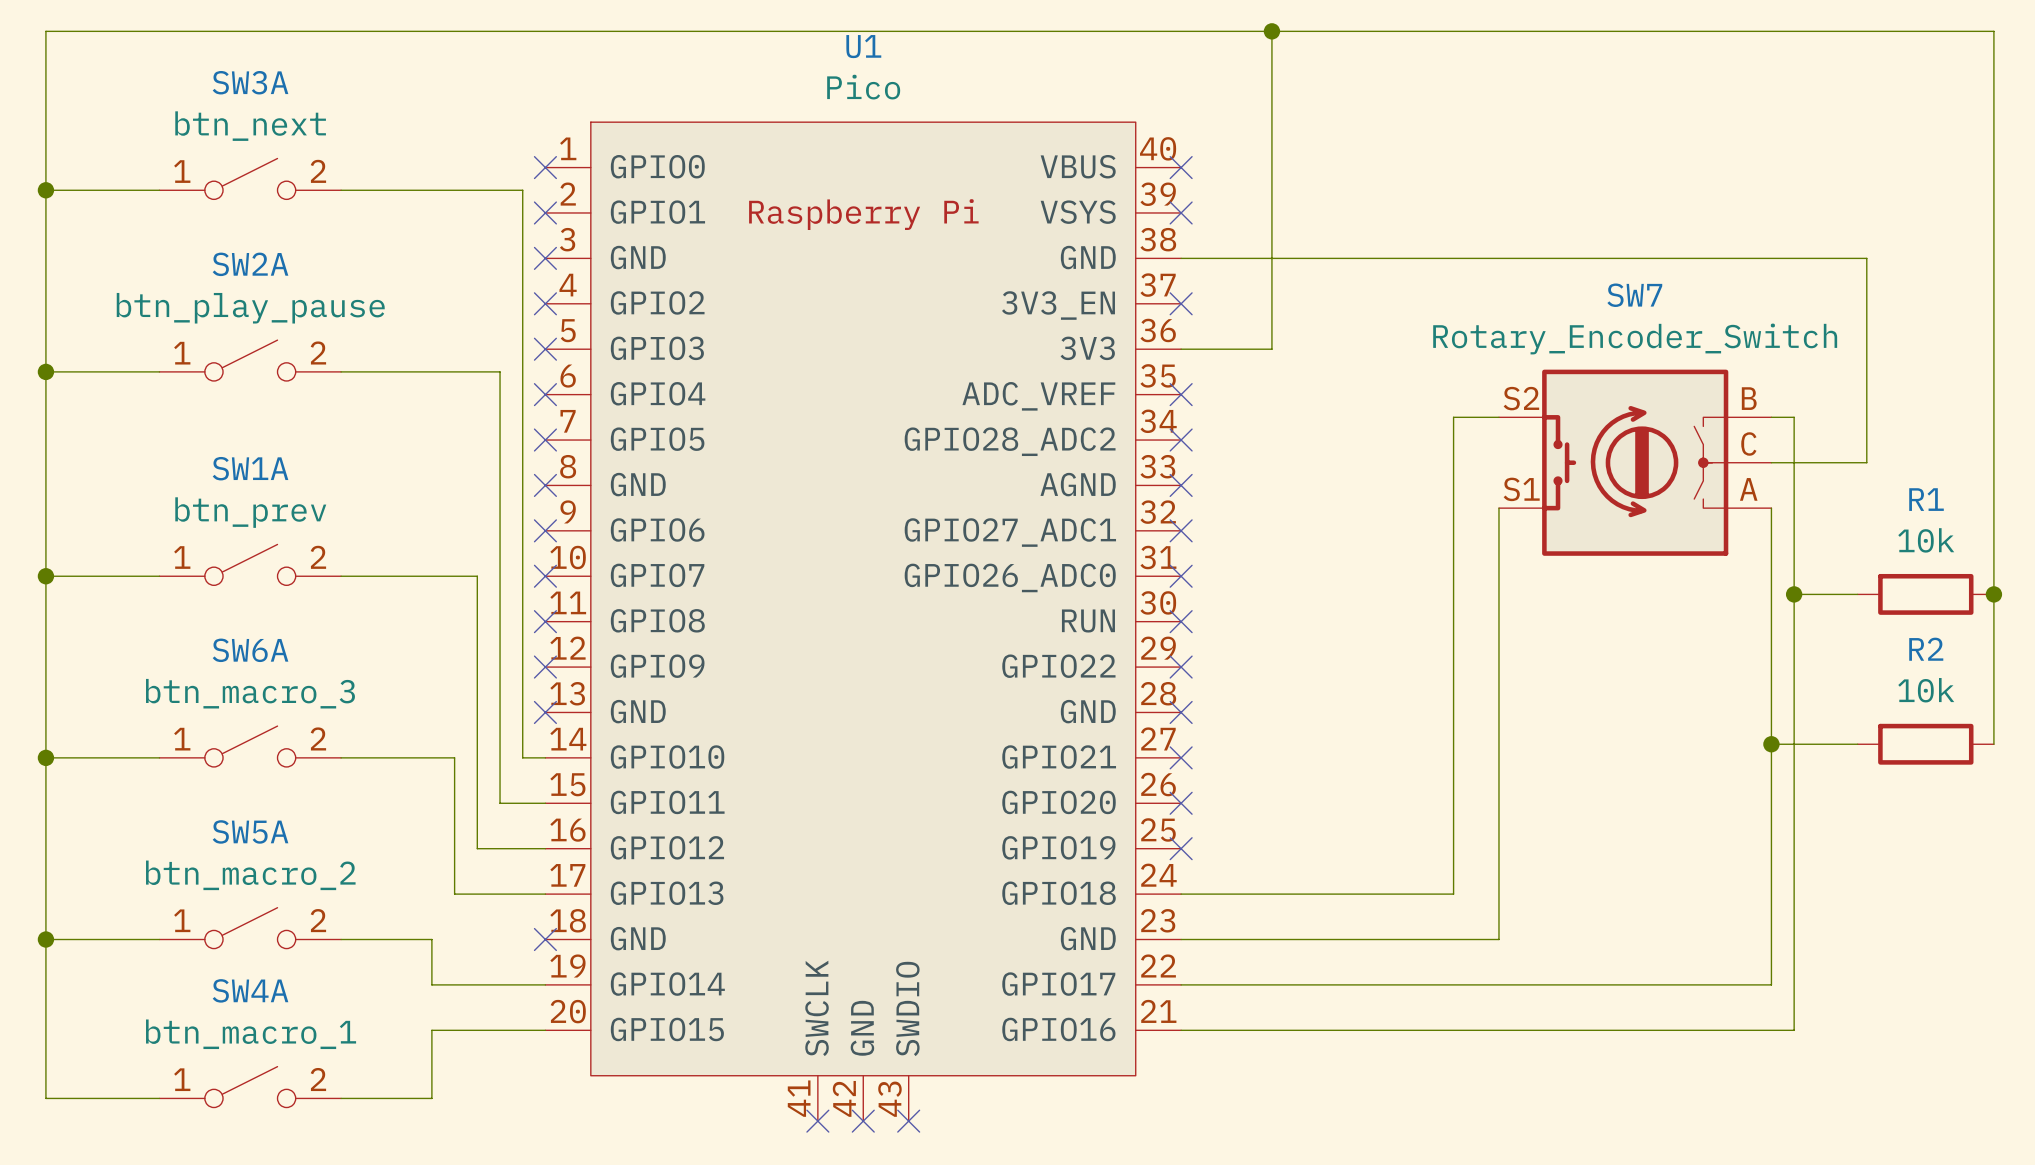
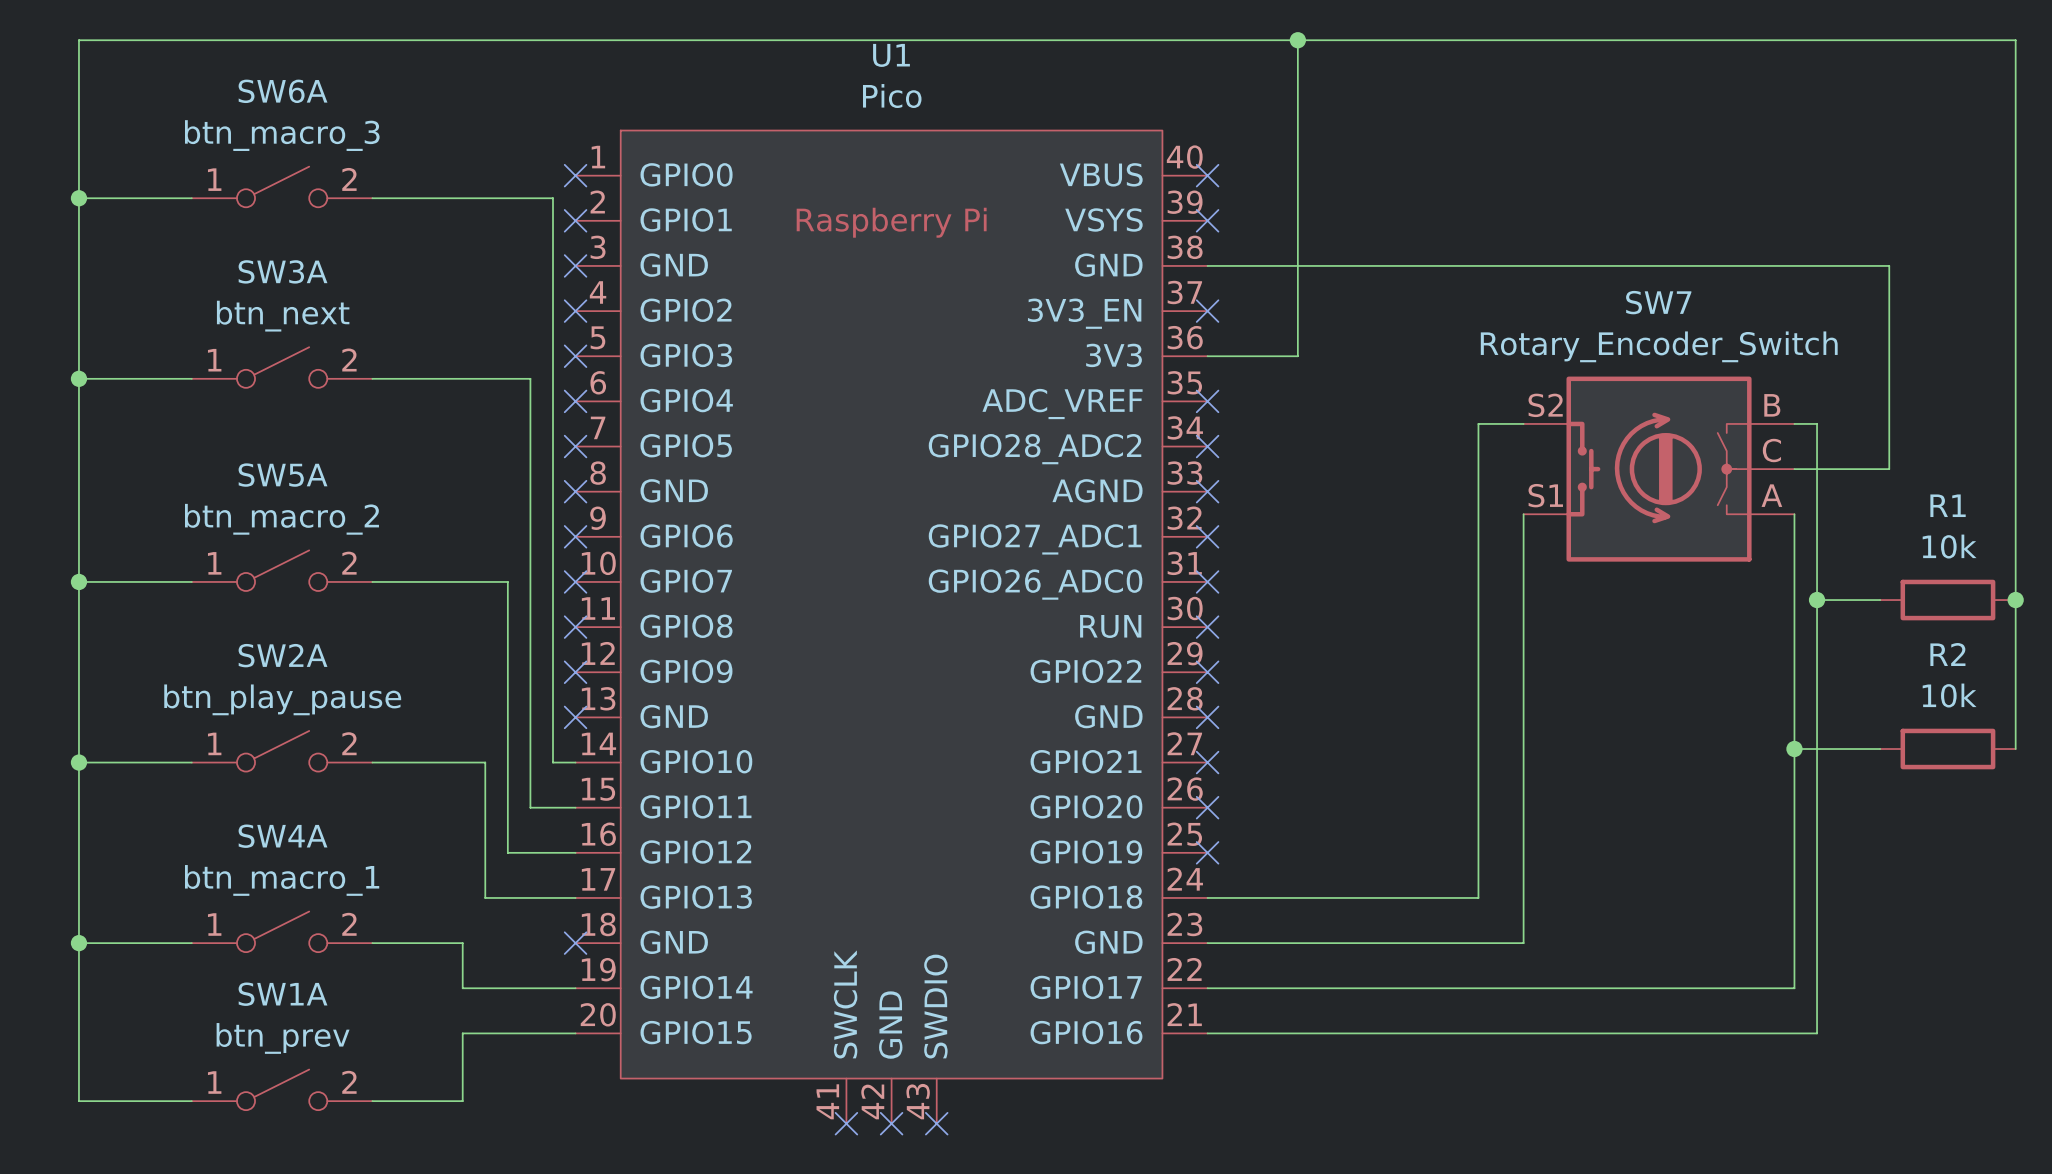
SW3A name: SW3A (250, 82) -> SW6A (283, 91)
SW3A value: btn_next (250, 126) -> btn_macro_3 (282, 135)
SW2A name: SW2A (250, 264) -> SW3A (283, 271)
SW2A value: btn_play_pause (250, 308) -> btn_next (283, 316)
SW1A name: SW1A (250, 468) -> SW5A (283, 475)
SW1A value: btn_prev (250, 512) -> btn_macro_2 (281, 519)
SW6A name: SW6A (250, 650) -> SW2A (283, 655)
SW6A value: btn_macro_3 (250, 693) -> btn_play_pause (282, 699)
SW5A name: SW5A (250, 831) -> SW4A (283, 836)
SW5A value: btn_macro_2 (250, 875) -> btn_macro_1 (282, 880)
SW4A name: SW4A (250, 990) -> SW1A (283, 994)
SW4A value: btn_macro_1 (251, 1034) -> btn_prev (283, 1038)

